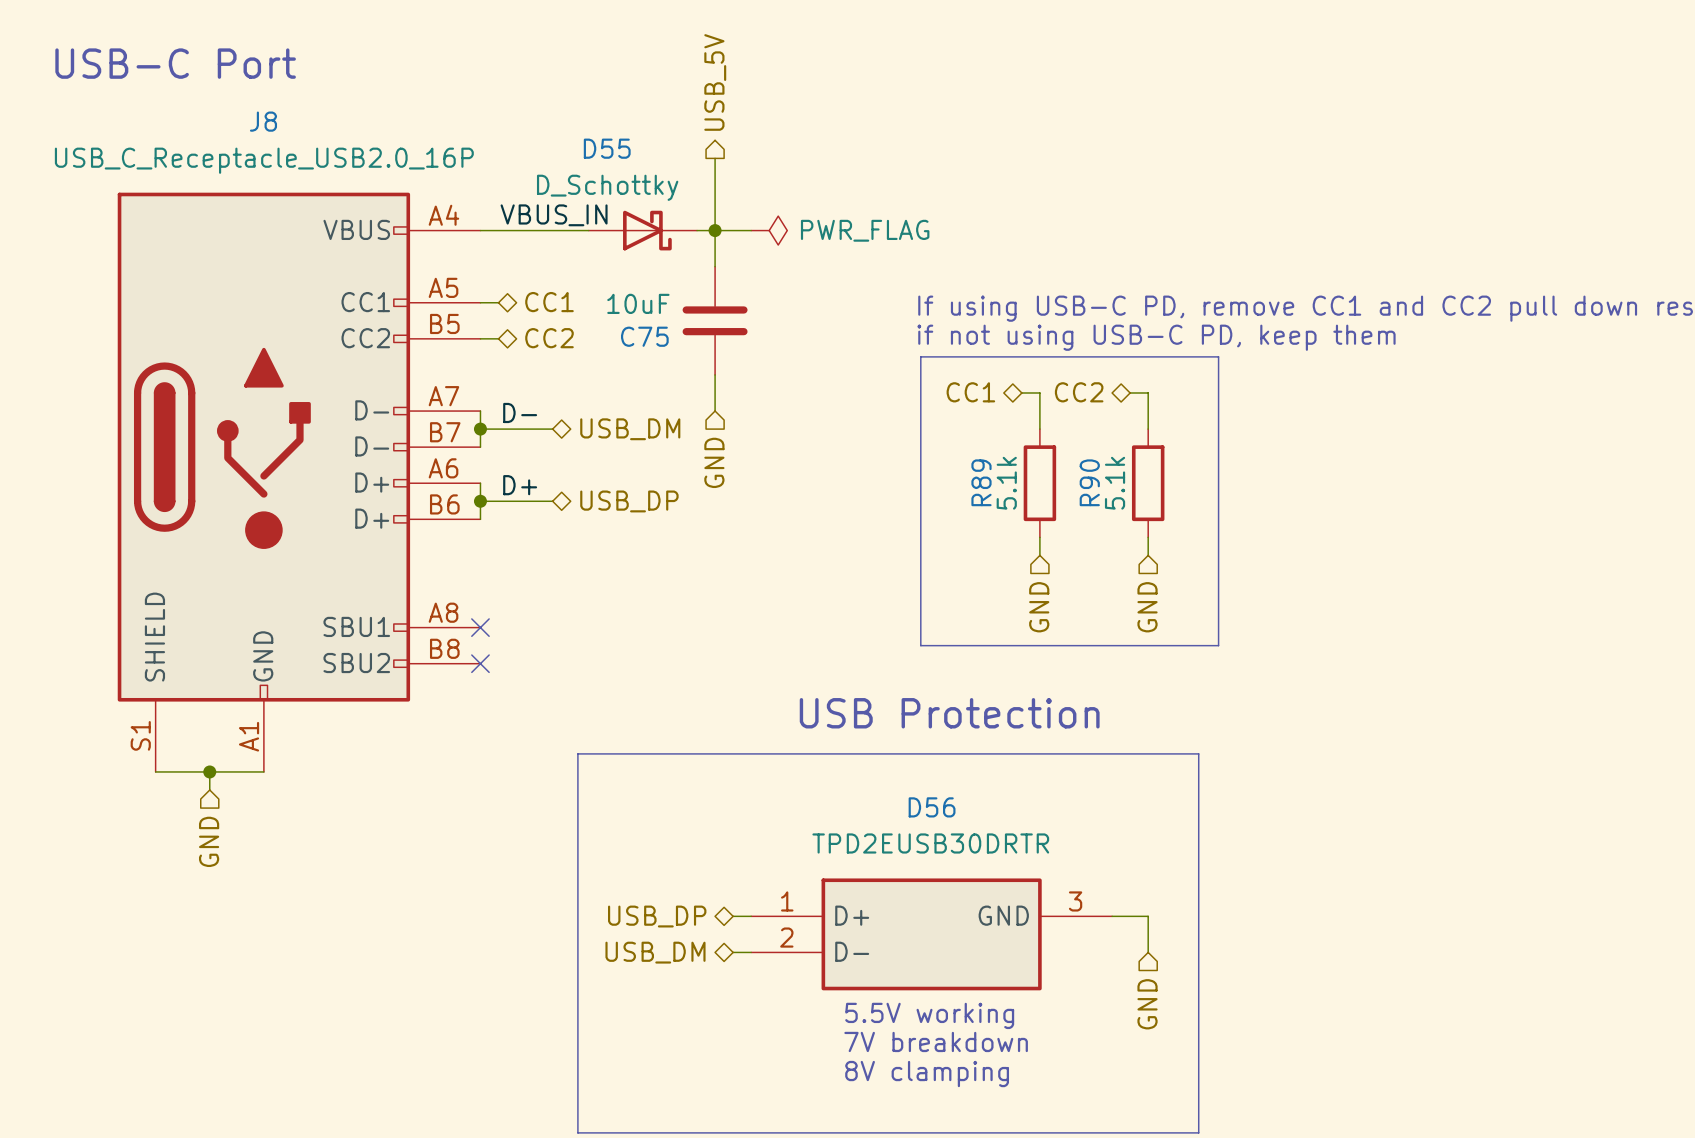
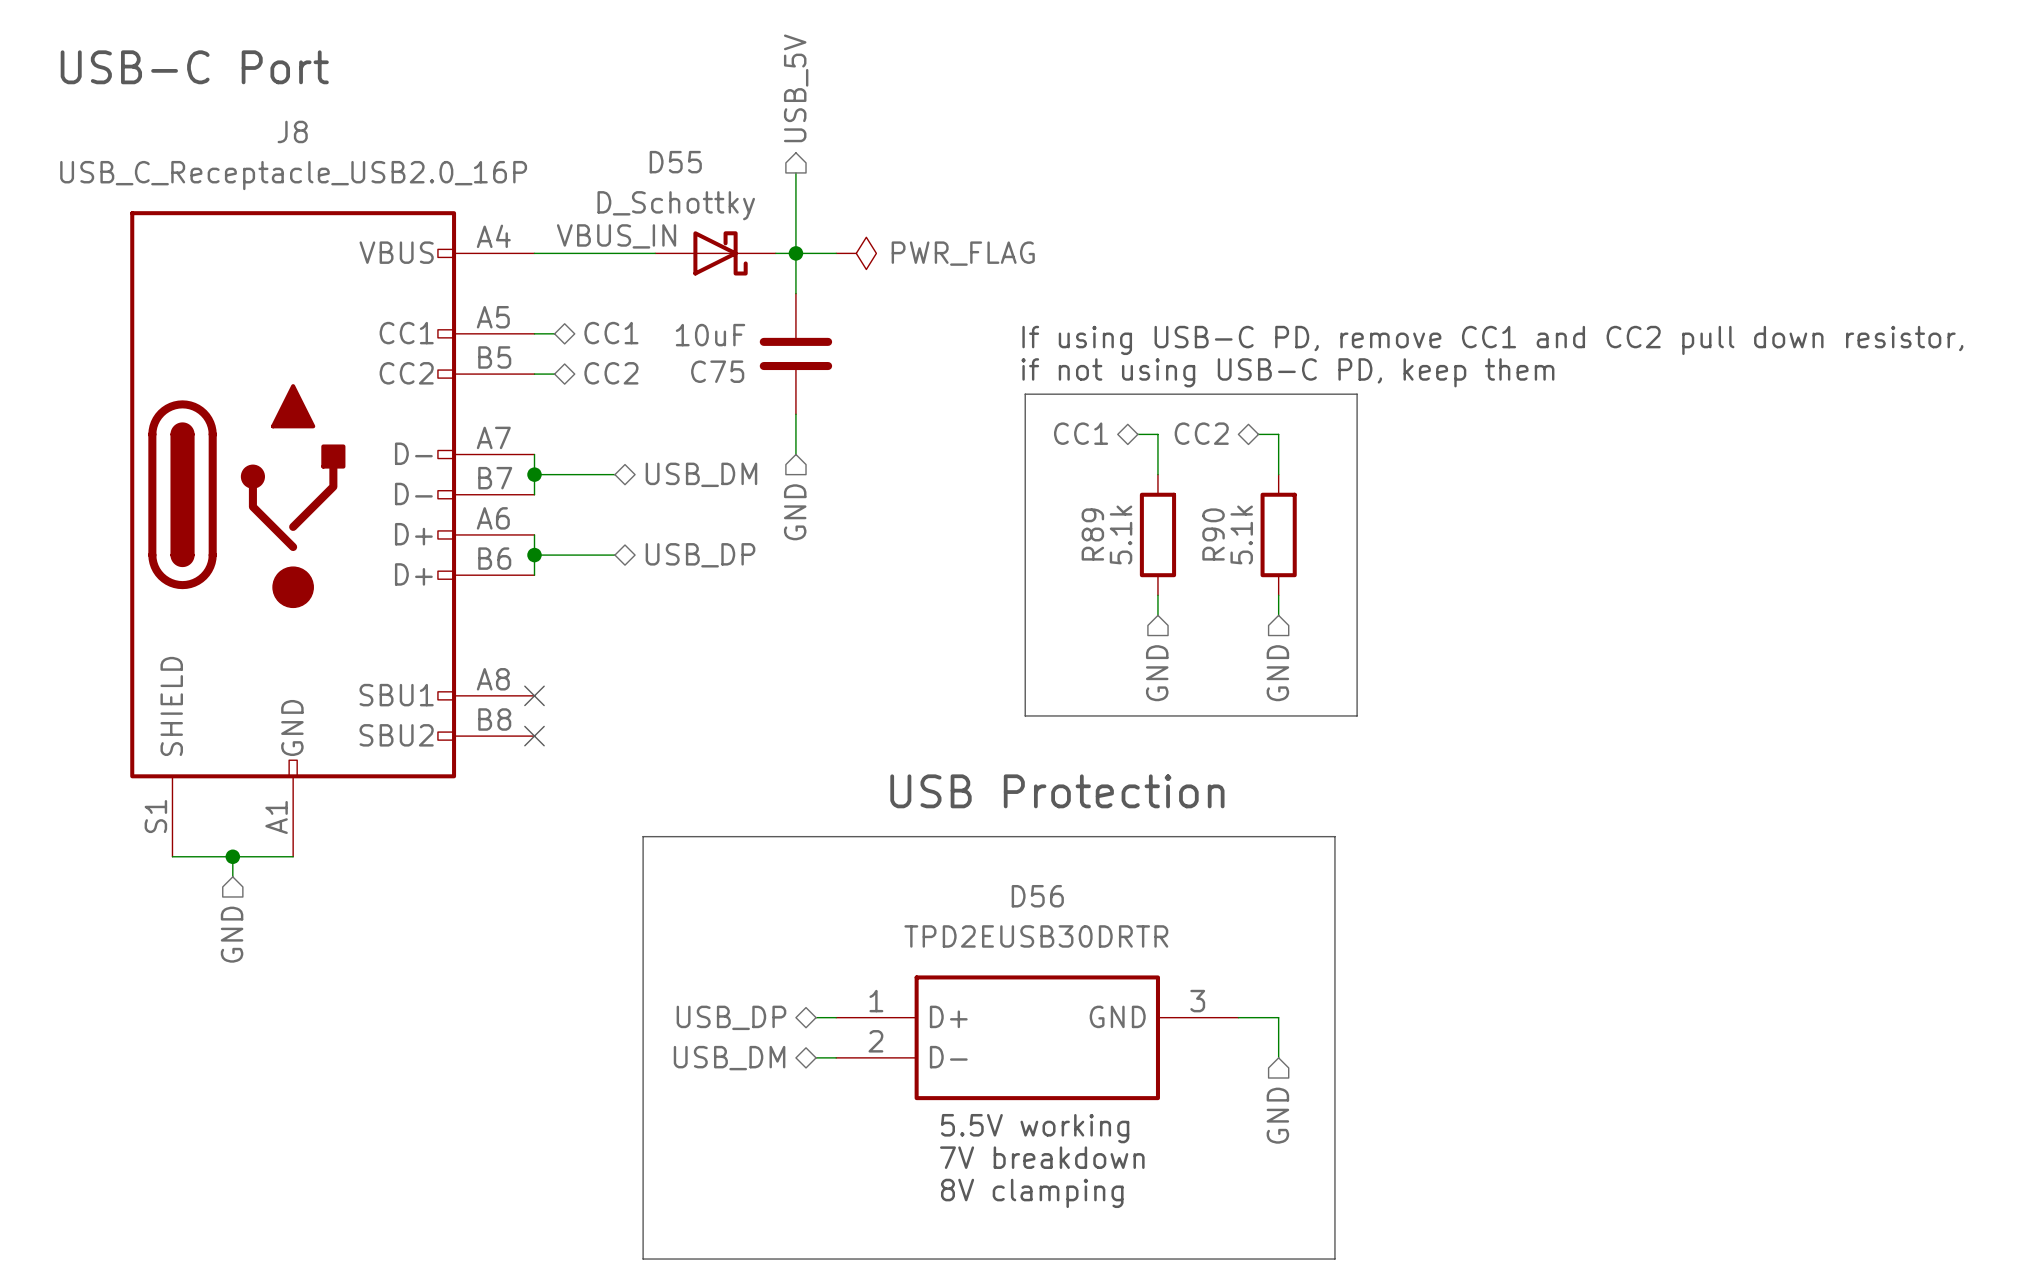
label: D- (520, 412) -> none
label: D+ (520, 485) -> none

